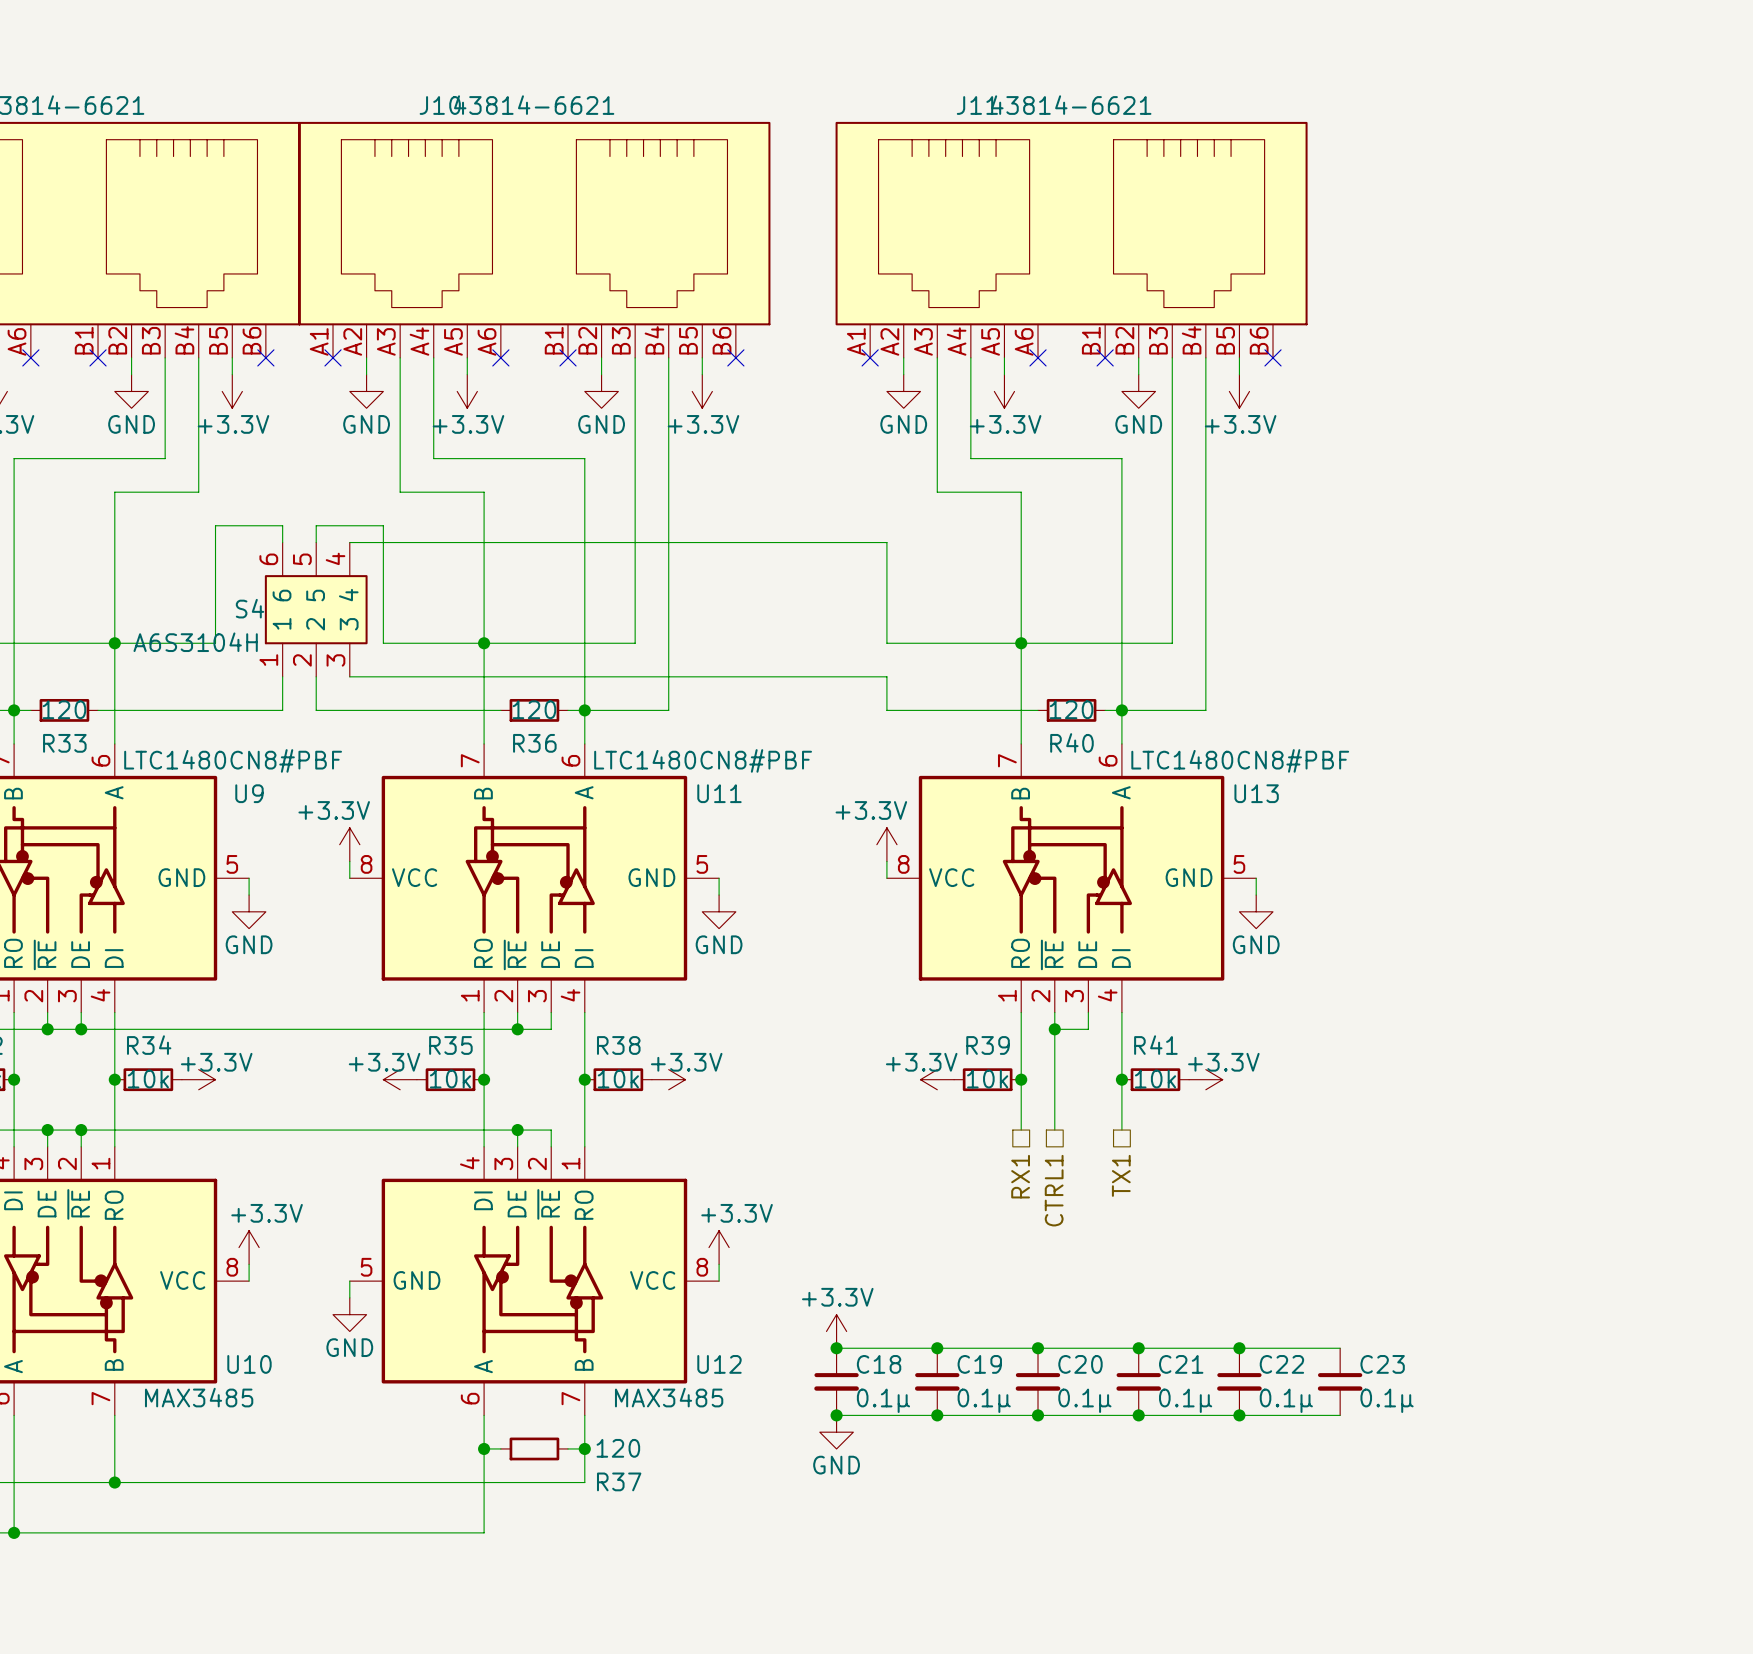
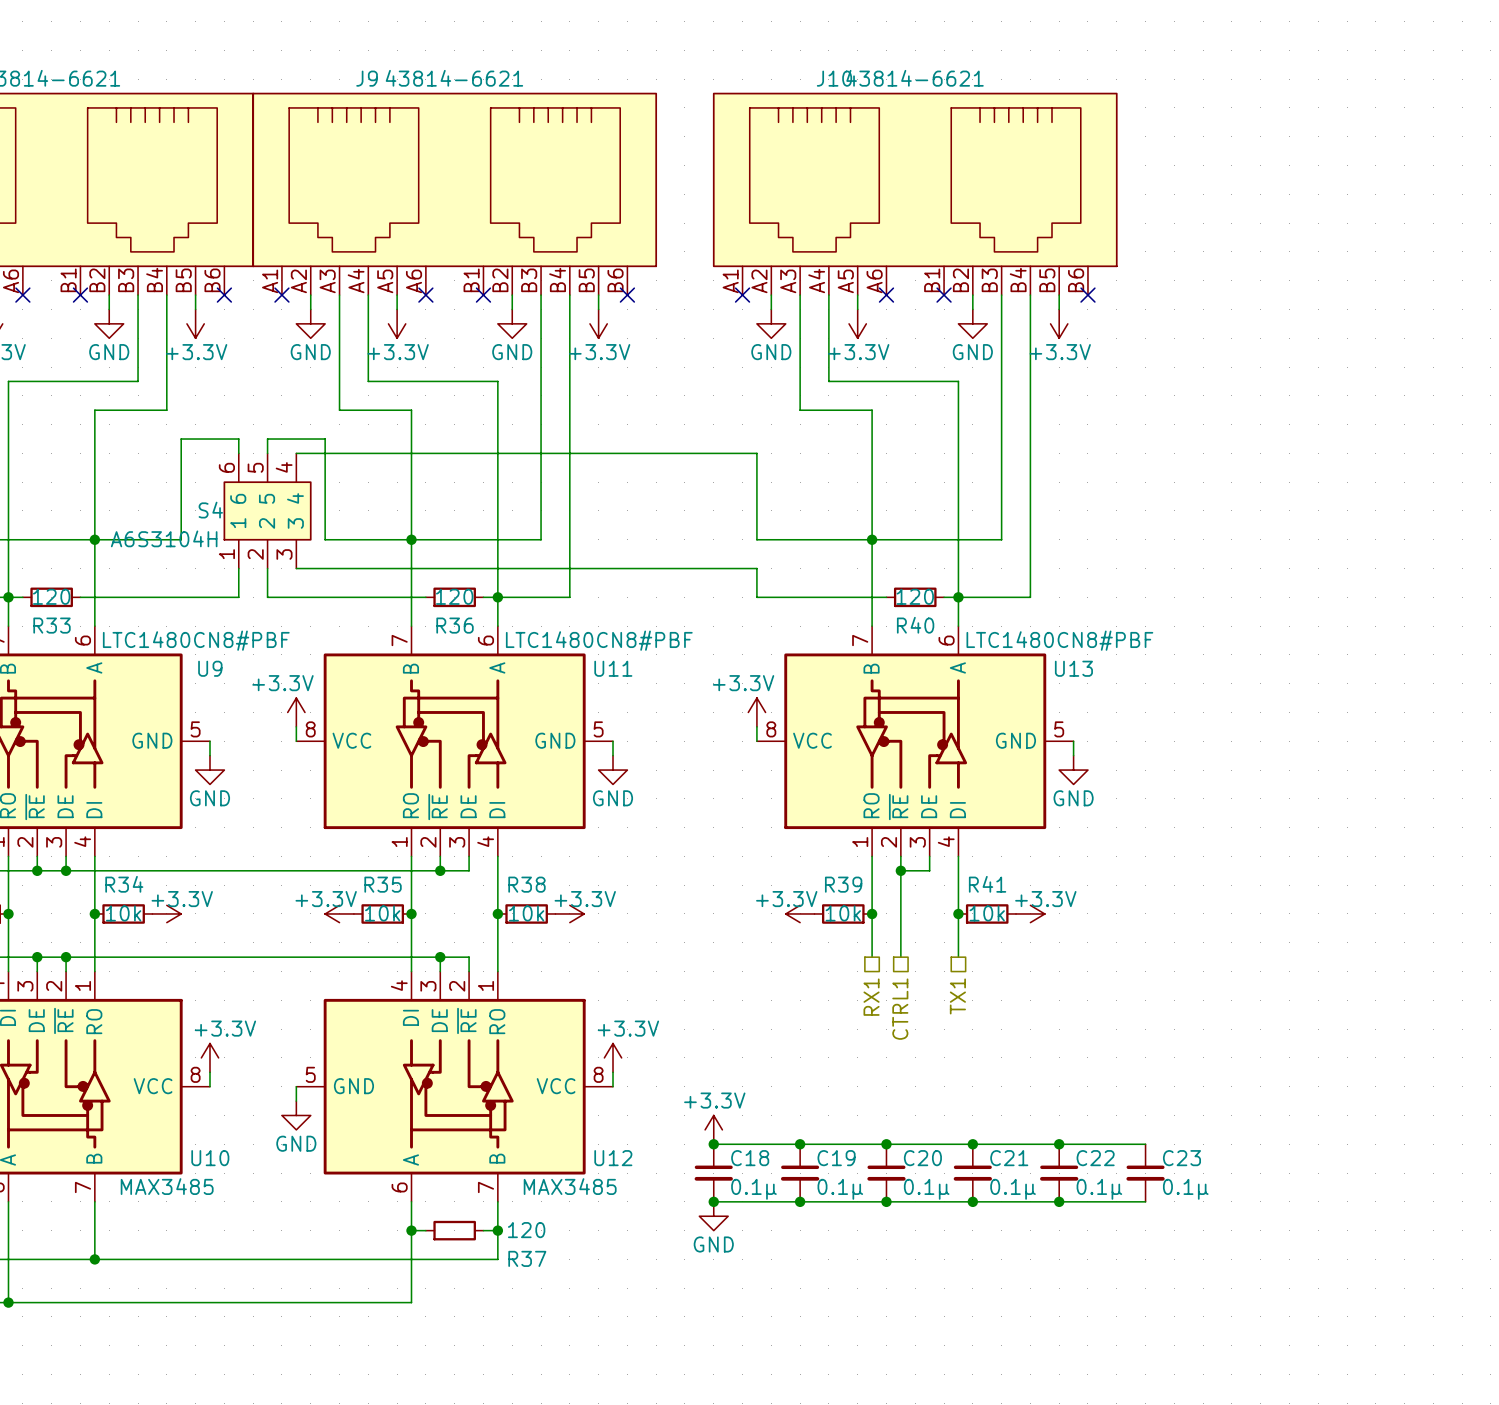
J10 name: J10 (440, 105) -> J9 (367, 78)
J11 name: J11 (977, 105) -> J10 (834, 78)

